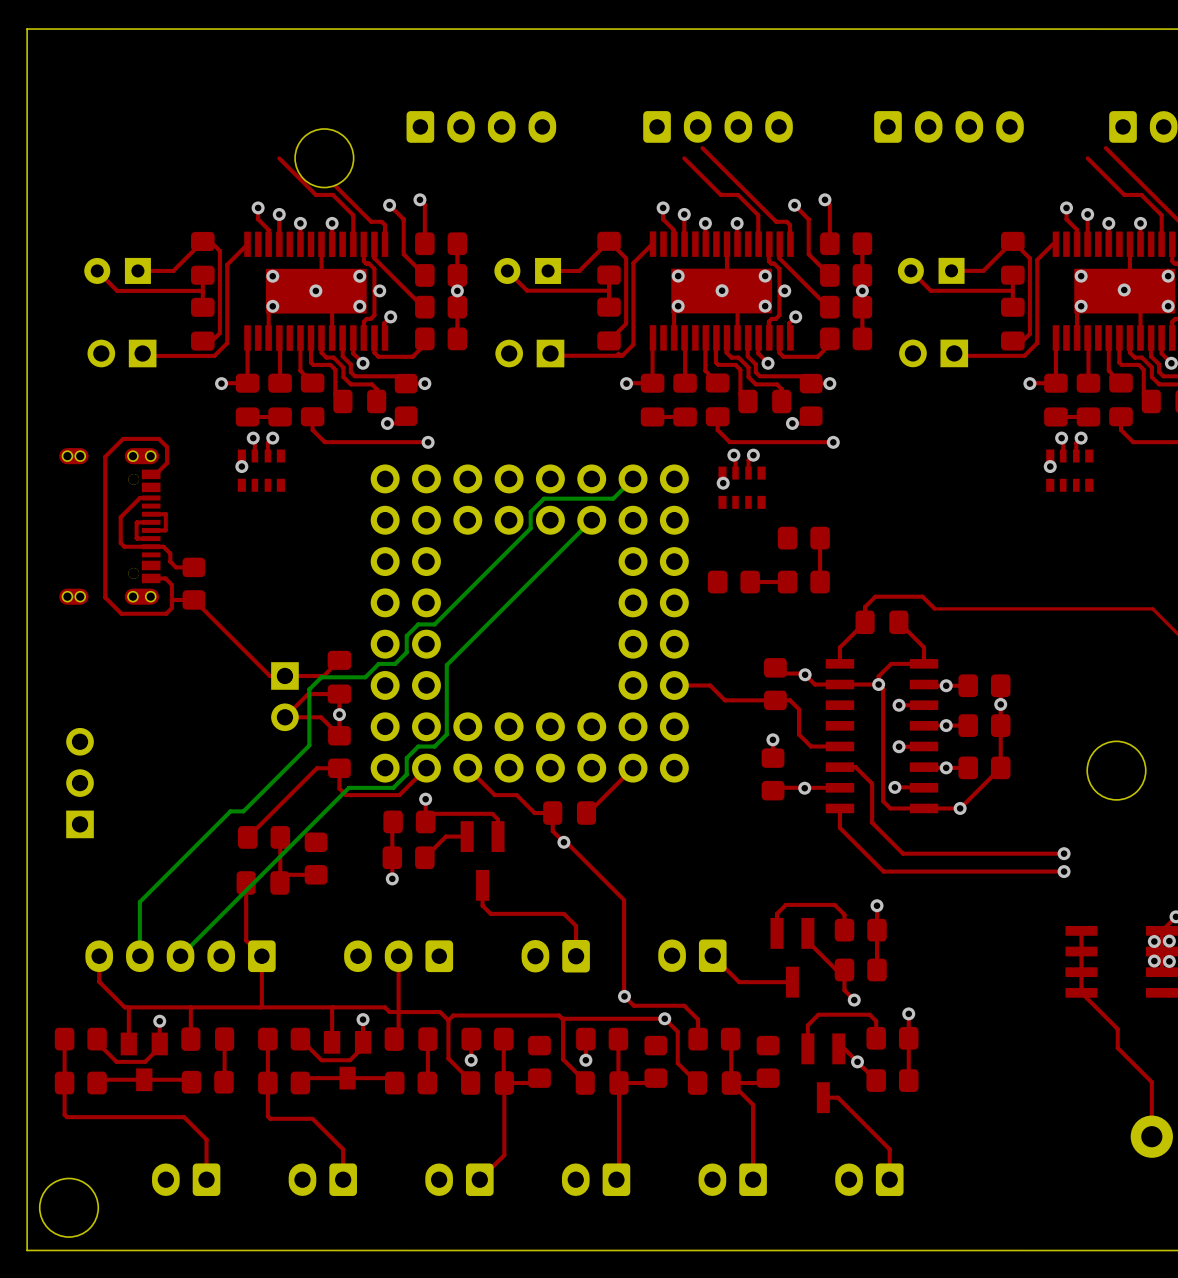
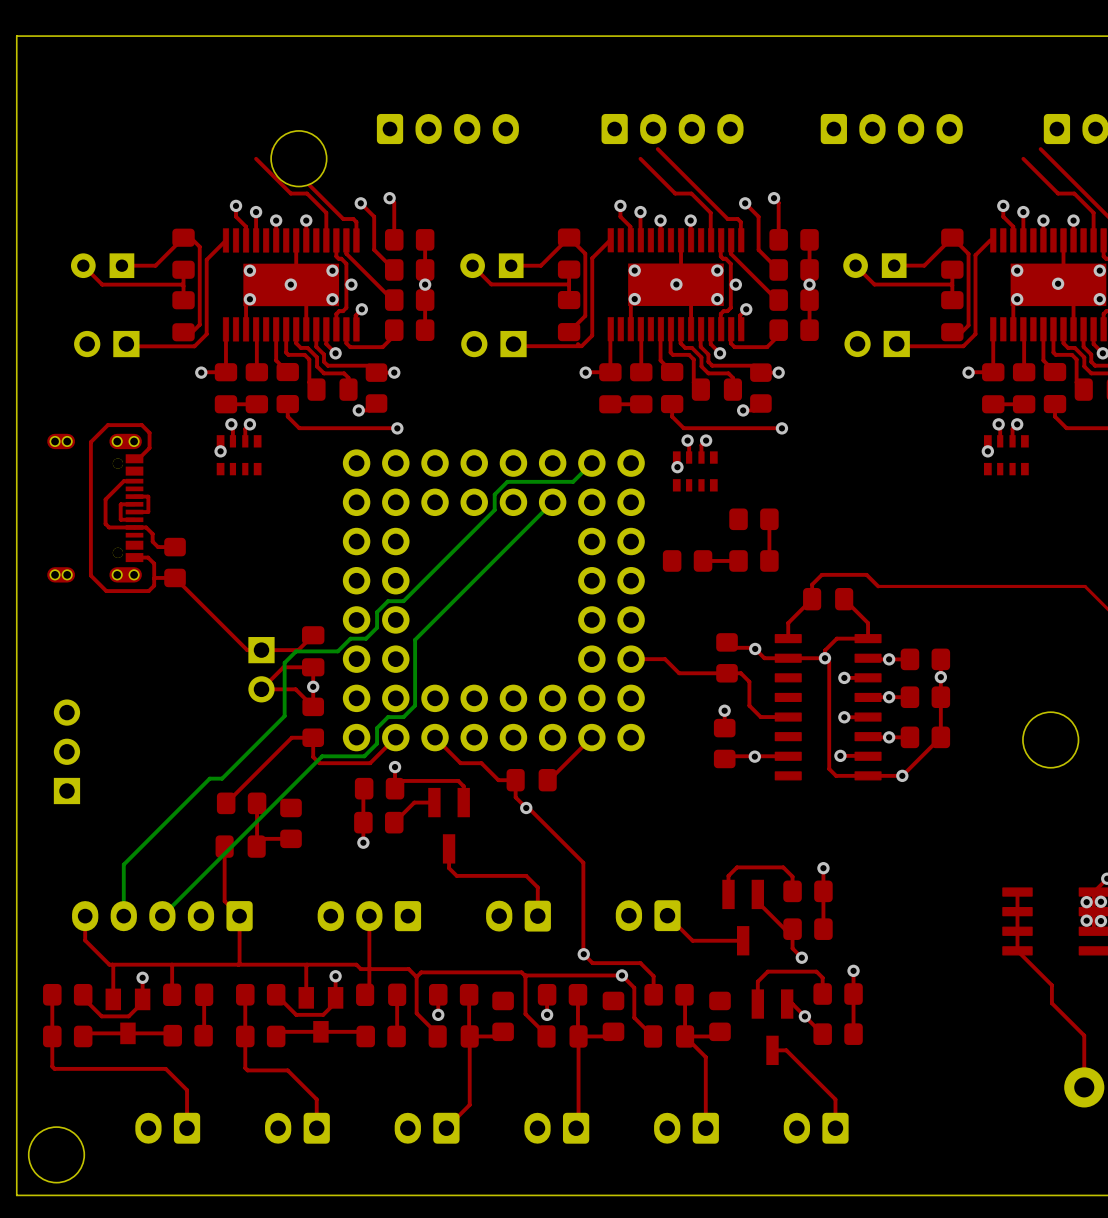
top track: (839, 767) (855, 767) (872, 783) (872, 822) (903, 853) (1064, 853) -> none
top track: (839, 808) (839, 827) (883, 871) (1064, 871) -> none
via: (1064, 853) -> none
via: (1064, 871) -> none

